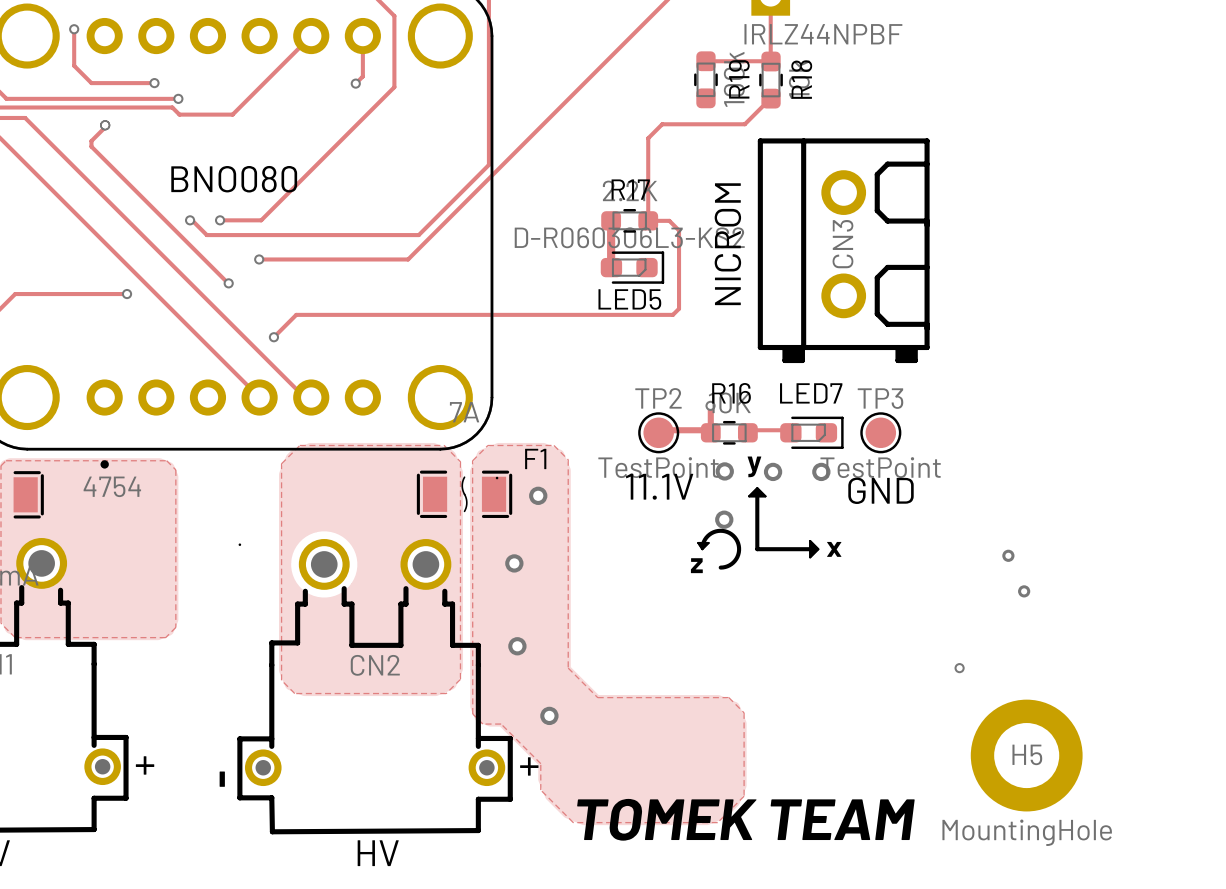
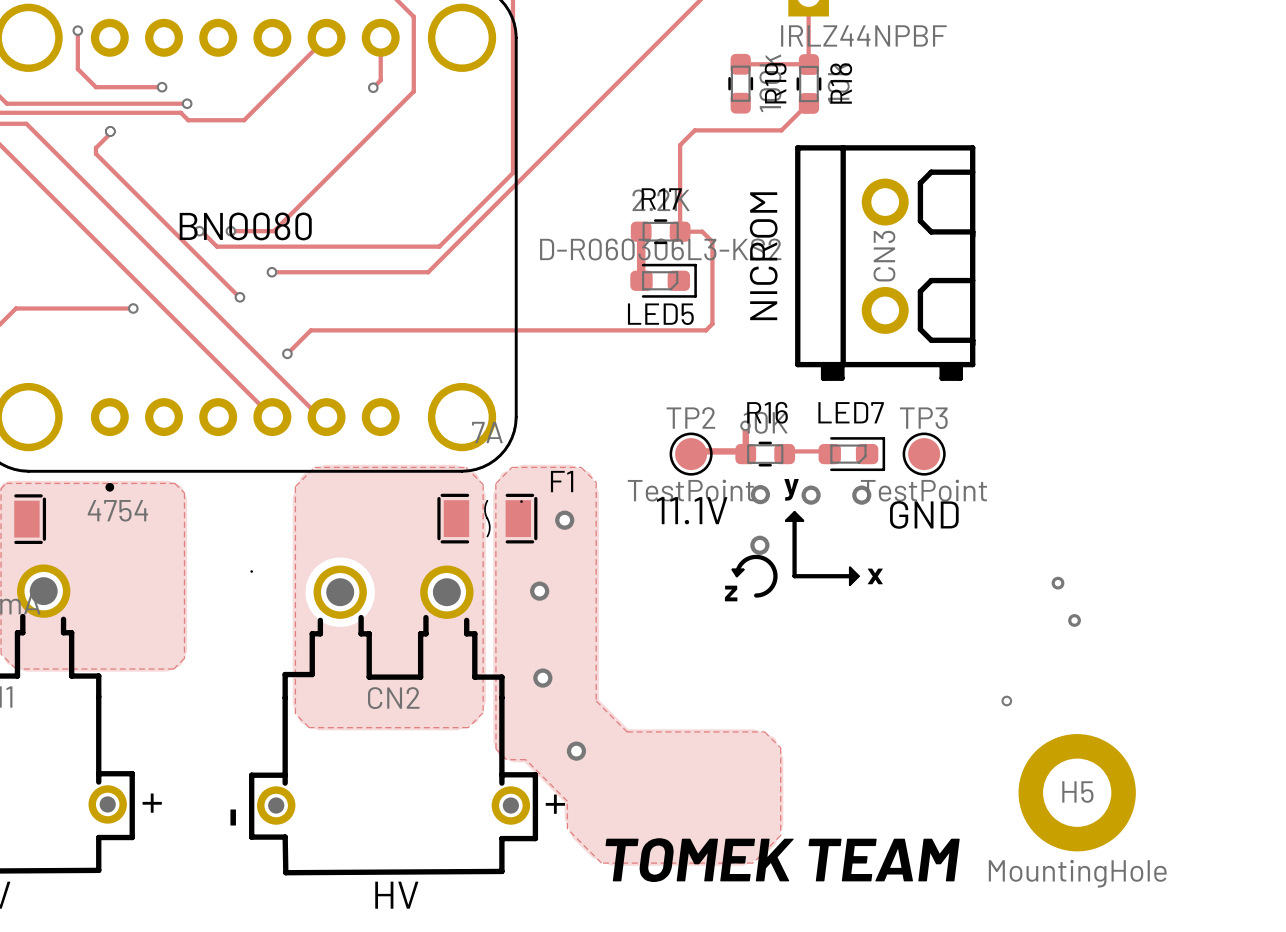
part text position: BNO080 (234, 179) -> BNO080 (245, 226)

